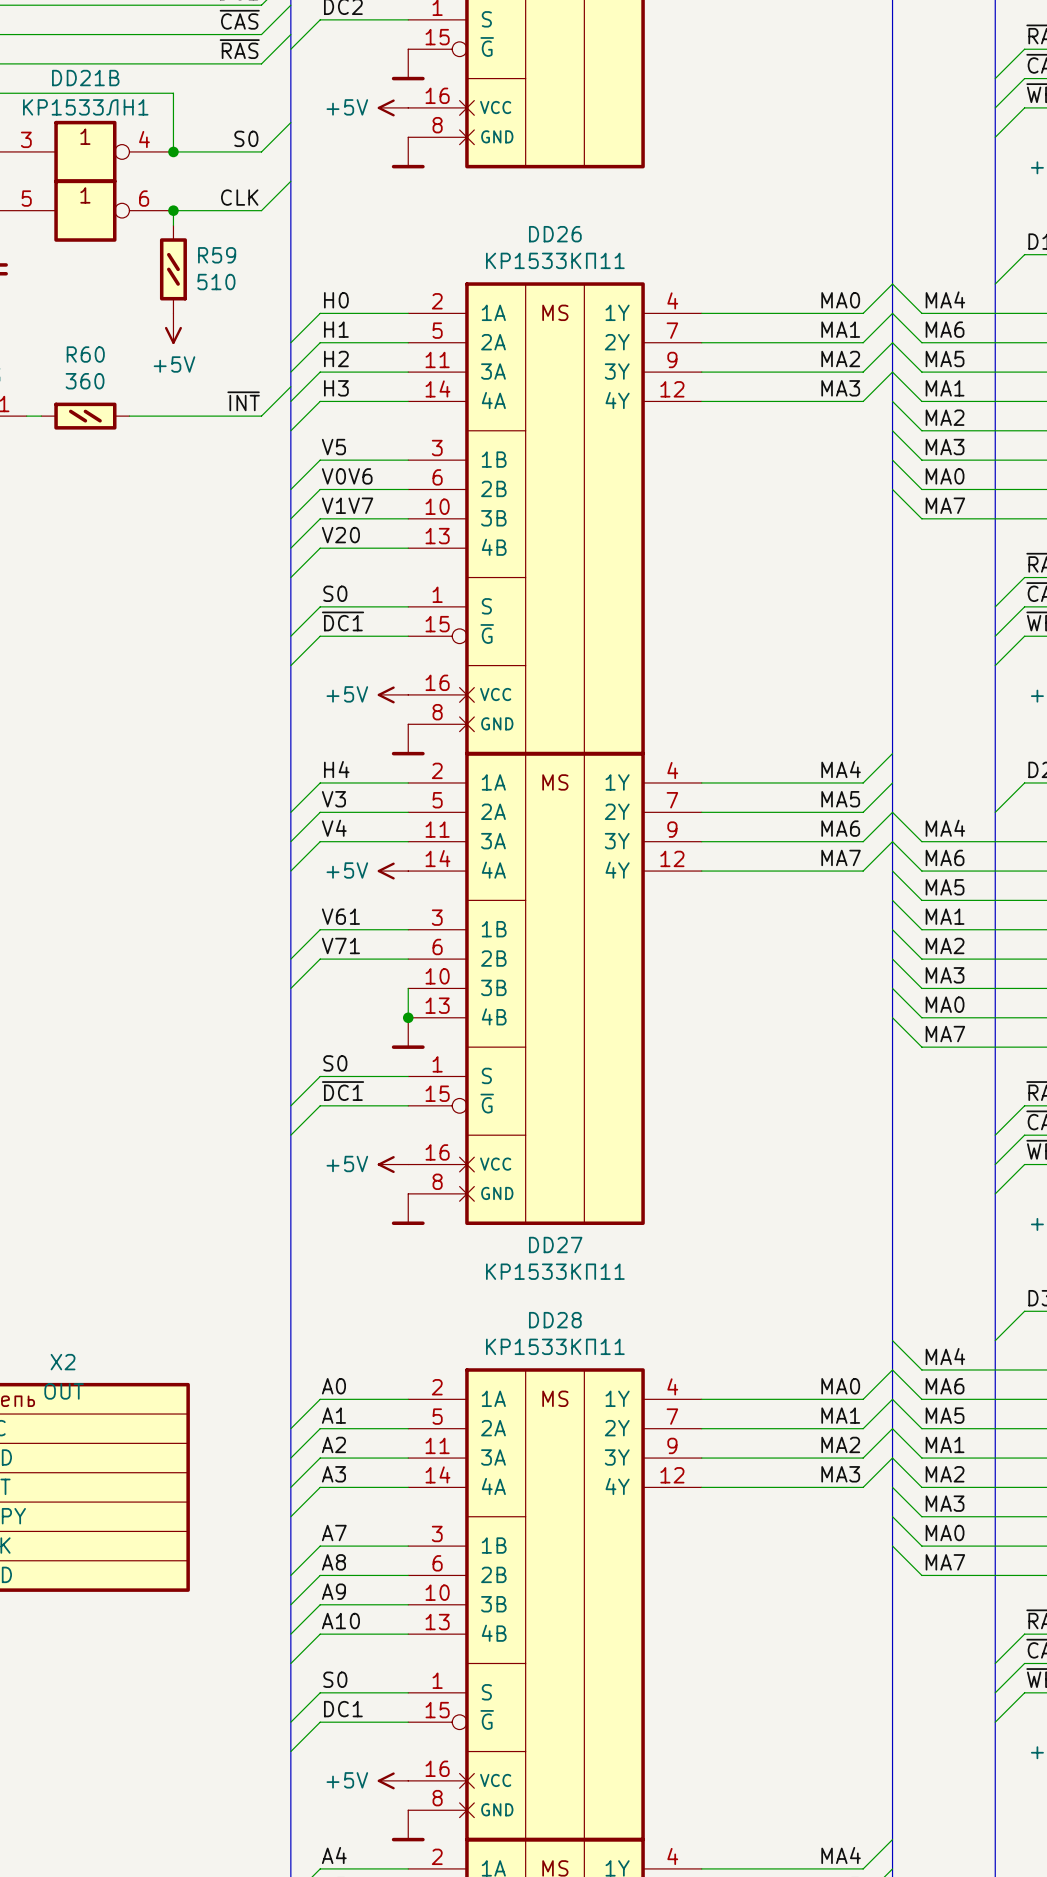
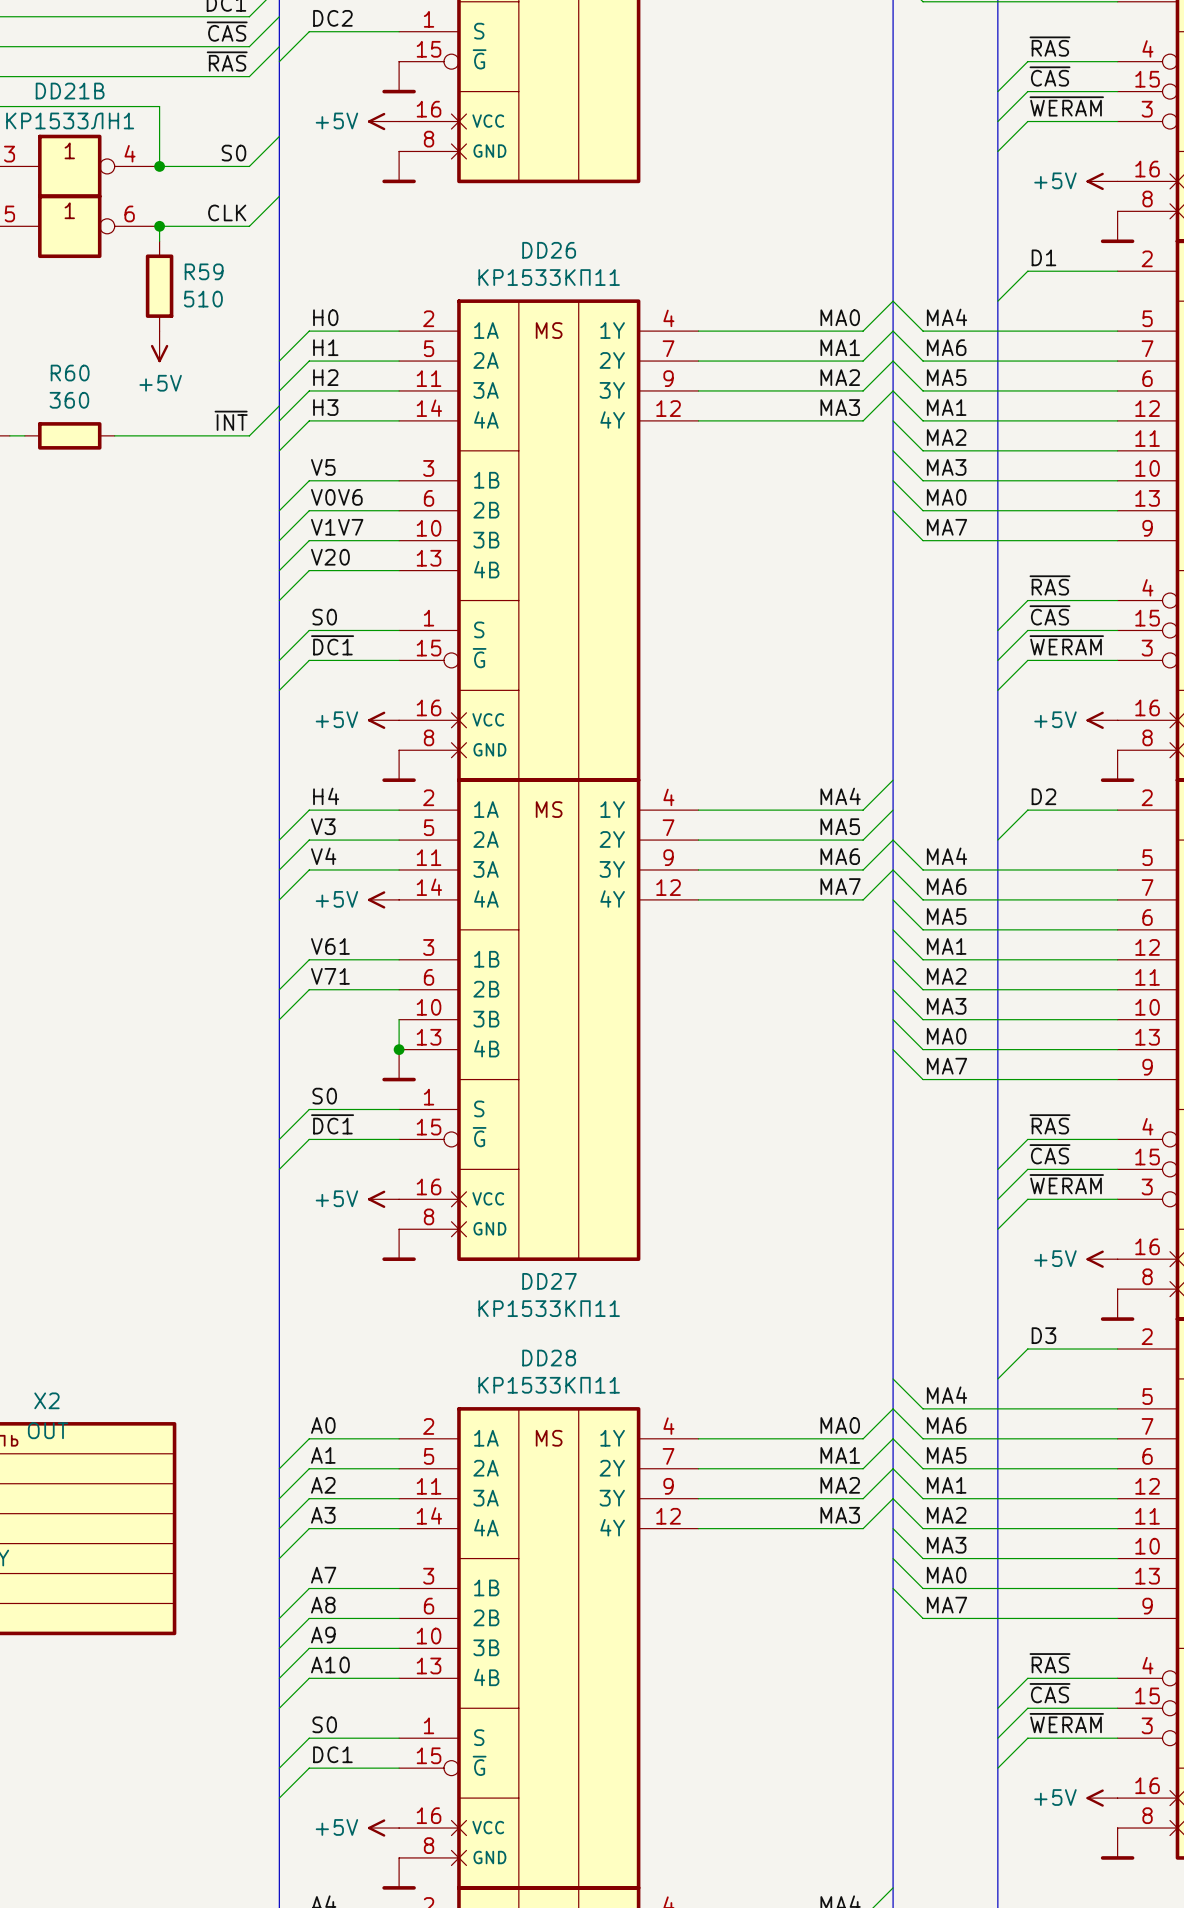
R59 symbol: [159, 225, 187, 314] -> [145, 241, 174, 332]
R60 symbol: [41, 402, 130, 430] -> [24, 422, 115, 450]

